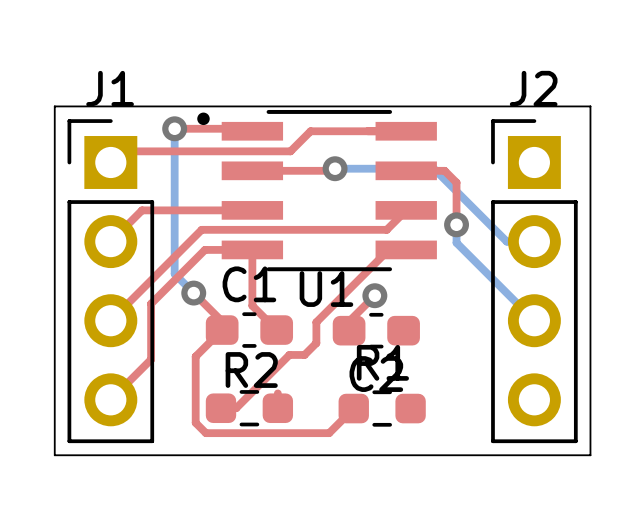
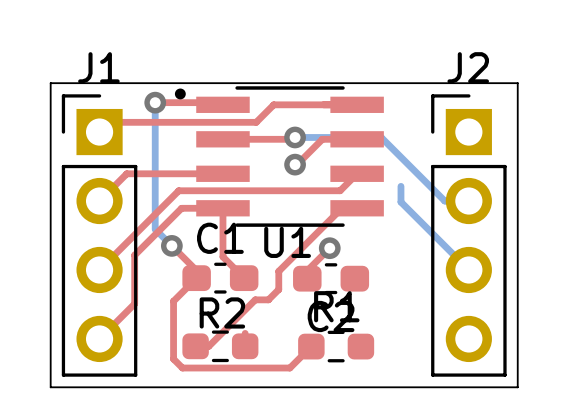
top track: (406, 170) (444, 170) (456, 182) (456, 224) -> (357, 139) (322, 139) (295, 164)
via position: (456, 224) -> (295, 164)

